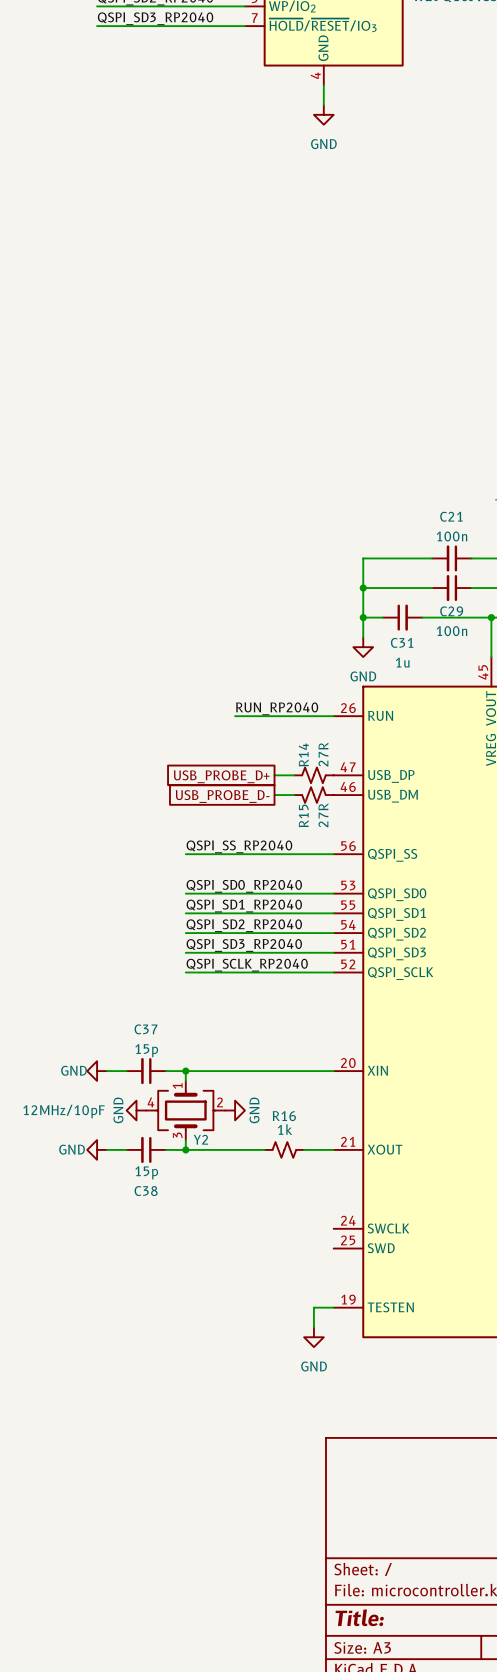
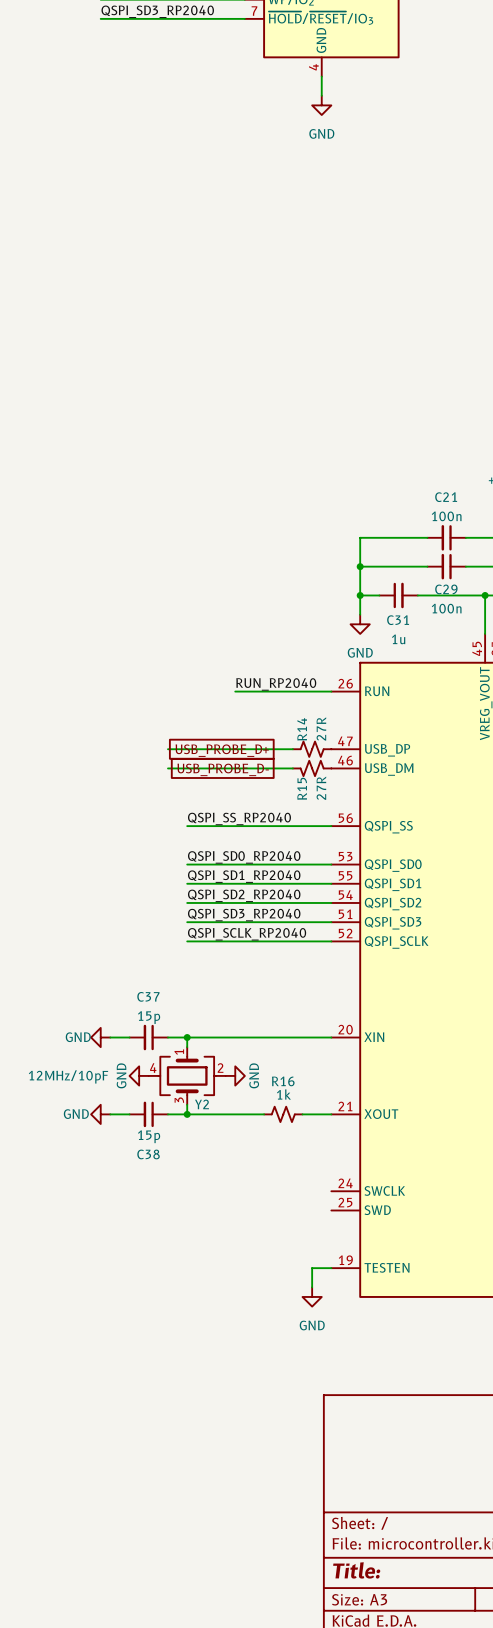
wire: none -> (167, 749) (273, 749)
wire: none -> (167, 768) (273, 768)

